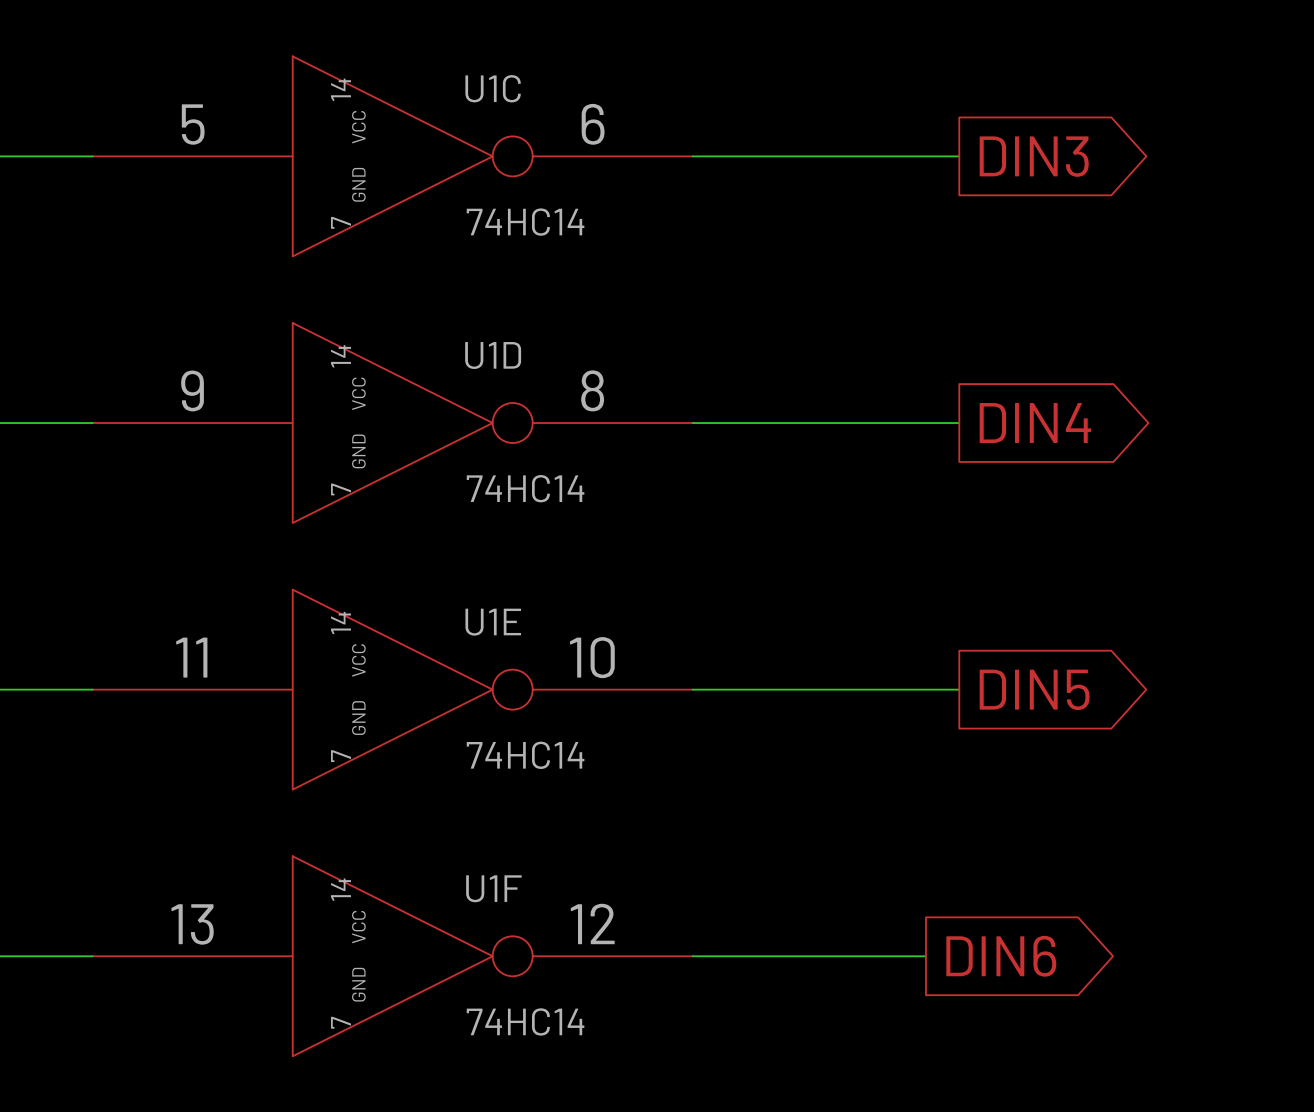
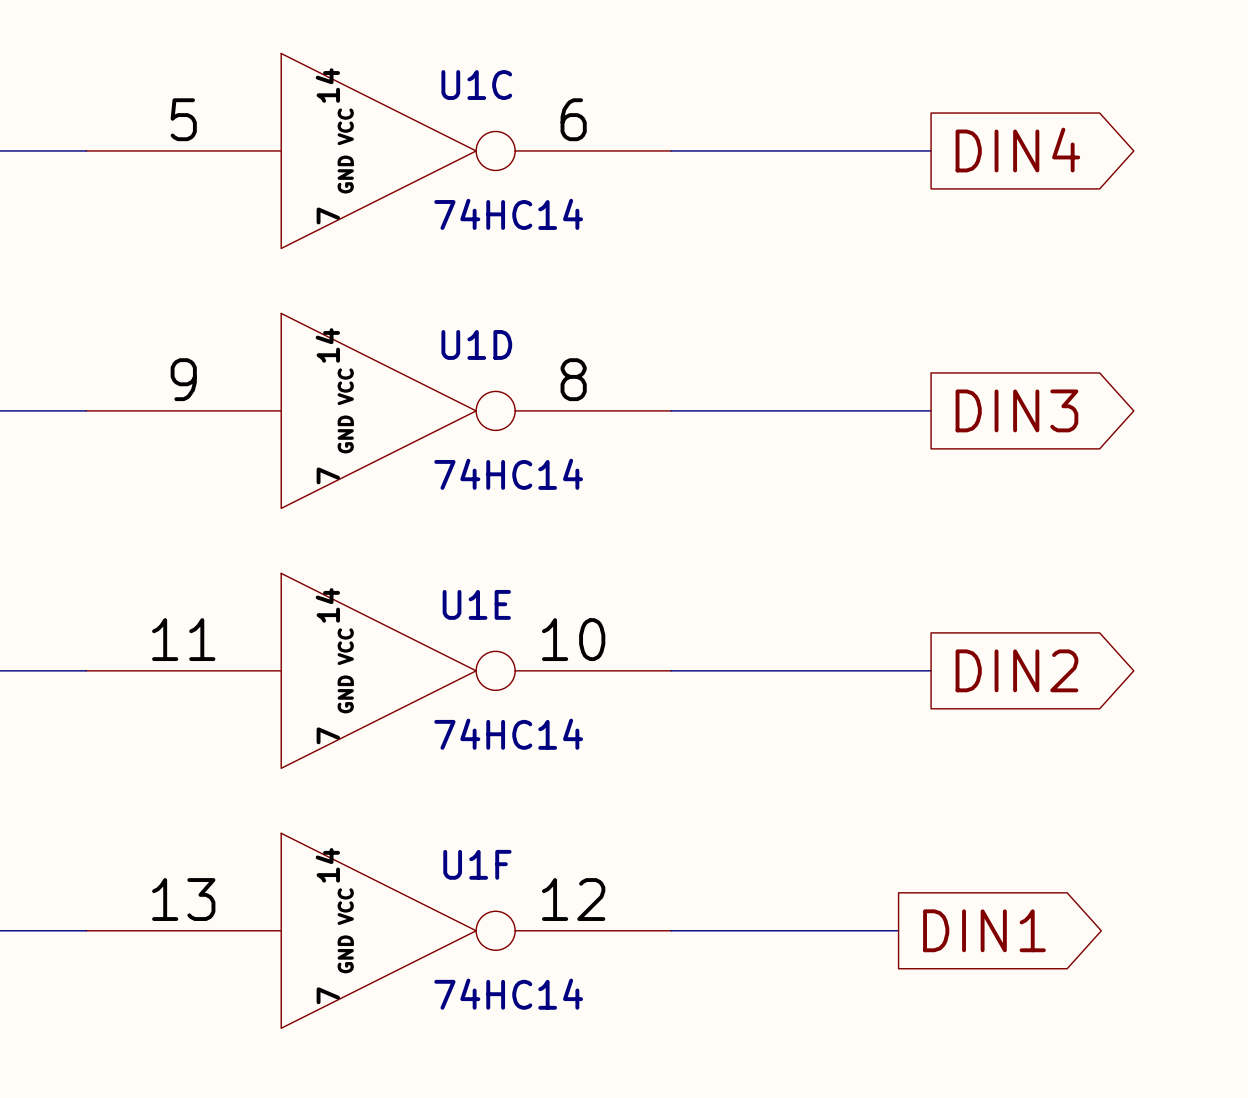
global label: DIN3 (1034, 156) -> DIN4 (1017, 150)
global label: DIN4 (1035, 423) -> DIN3 (1016, 410)
global label: DIN5 (1034, 689) -> DIN2 (1016, 670)
global label: DIN6 (1001, 956) -> DIN1 (984, 930)

